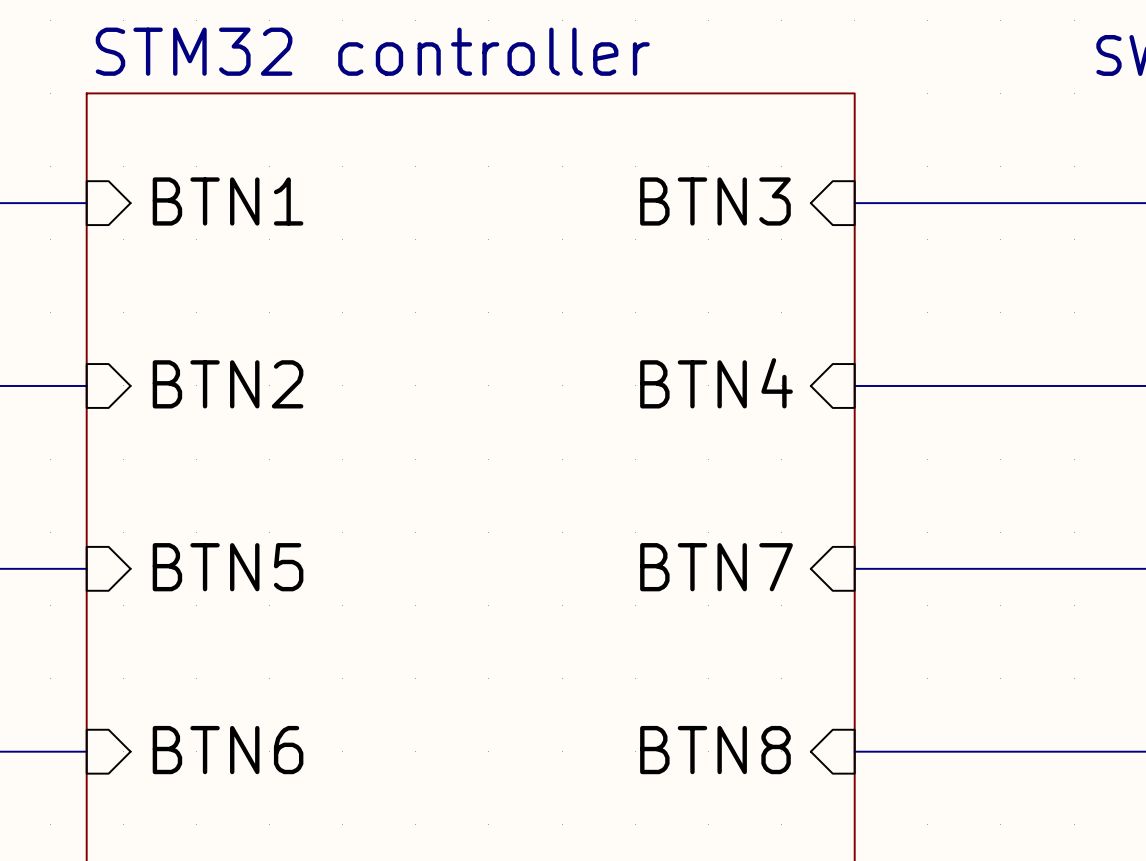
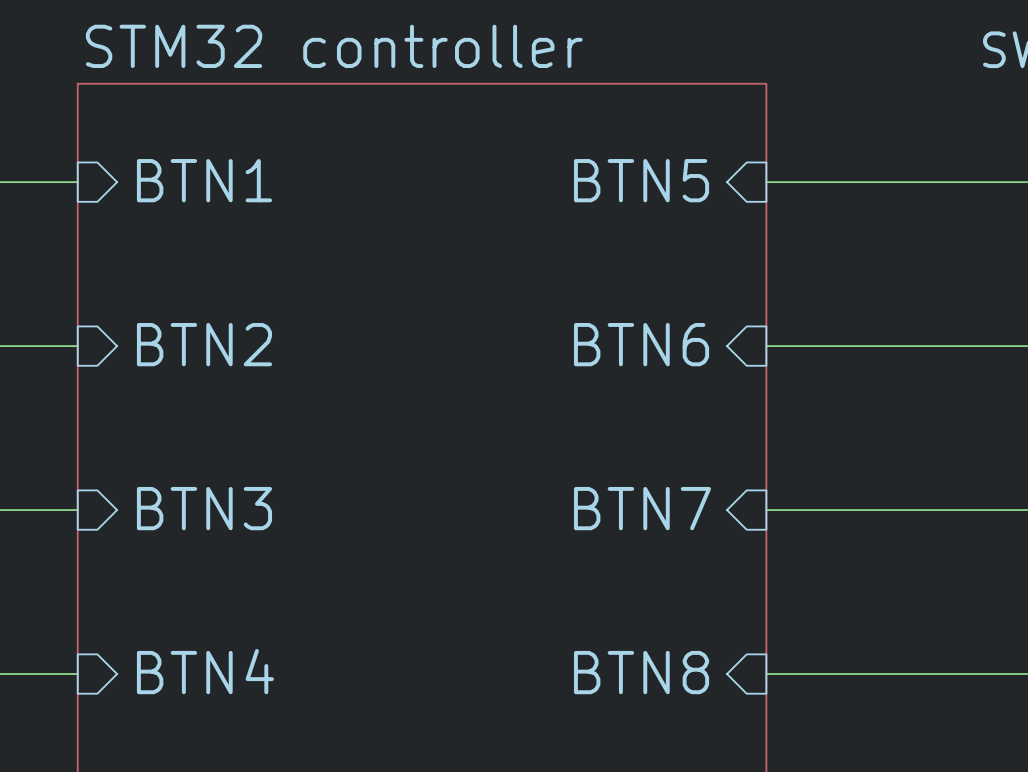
sheet pin: BTN3 (715, 201) -> BTN5 (641, 180)
sheet pin: BTN4 (716, 383) -> BTN6 (641, 344)
sheet pin: BTN5 (228, 567) -> BTN3 (204, 508)
sheet pin: BTN6 (228, 750) -> BTN4 (205, 671)

